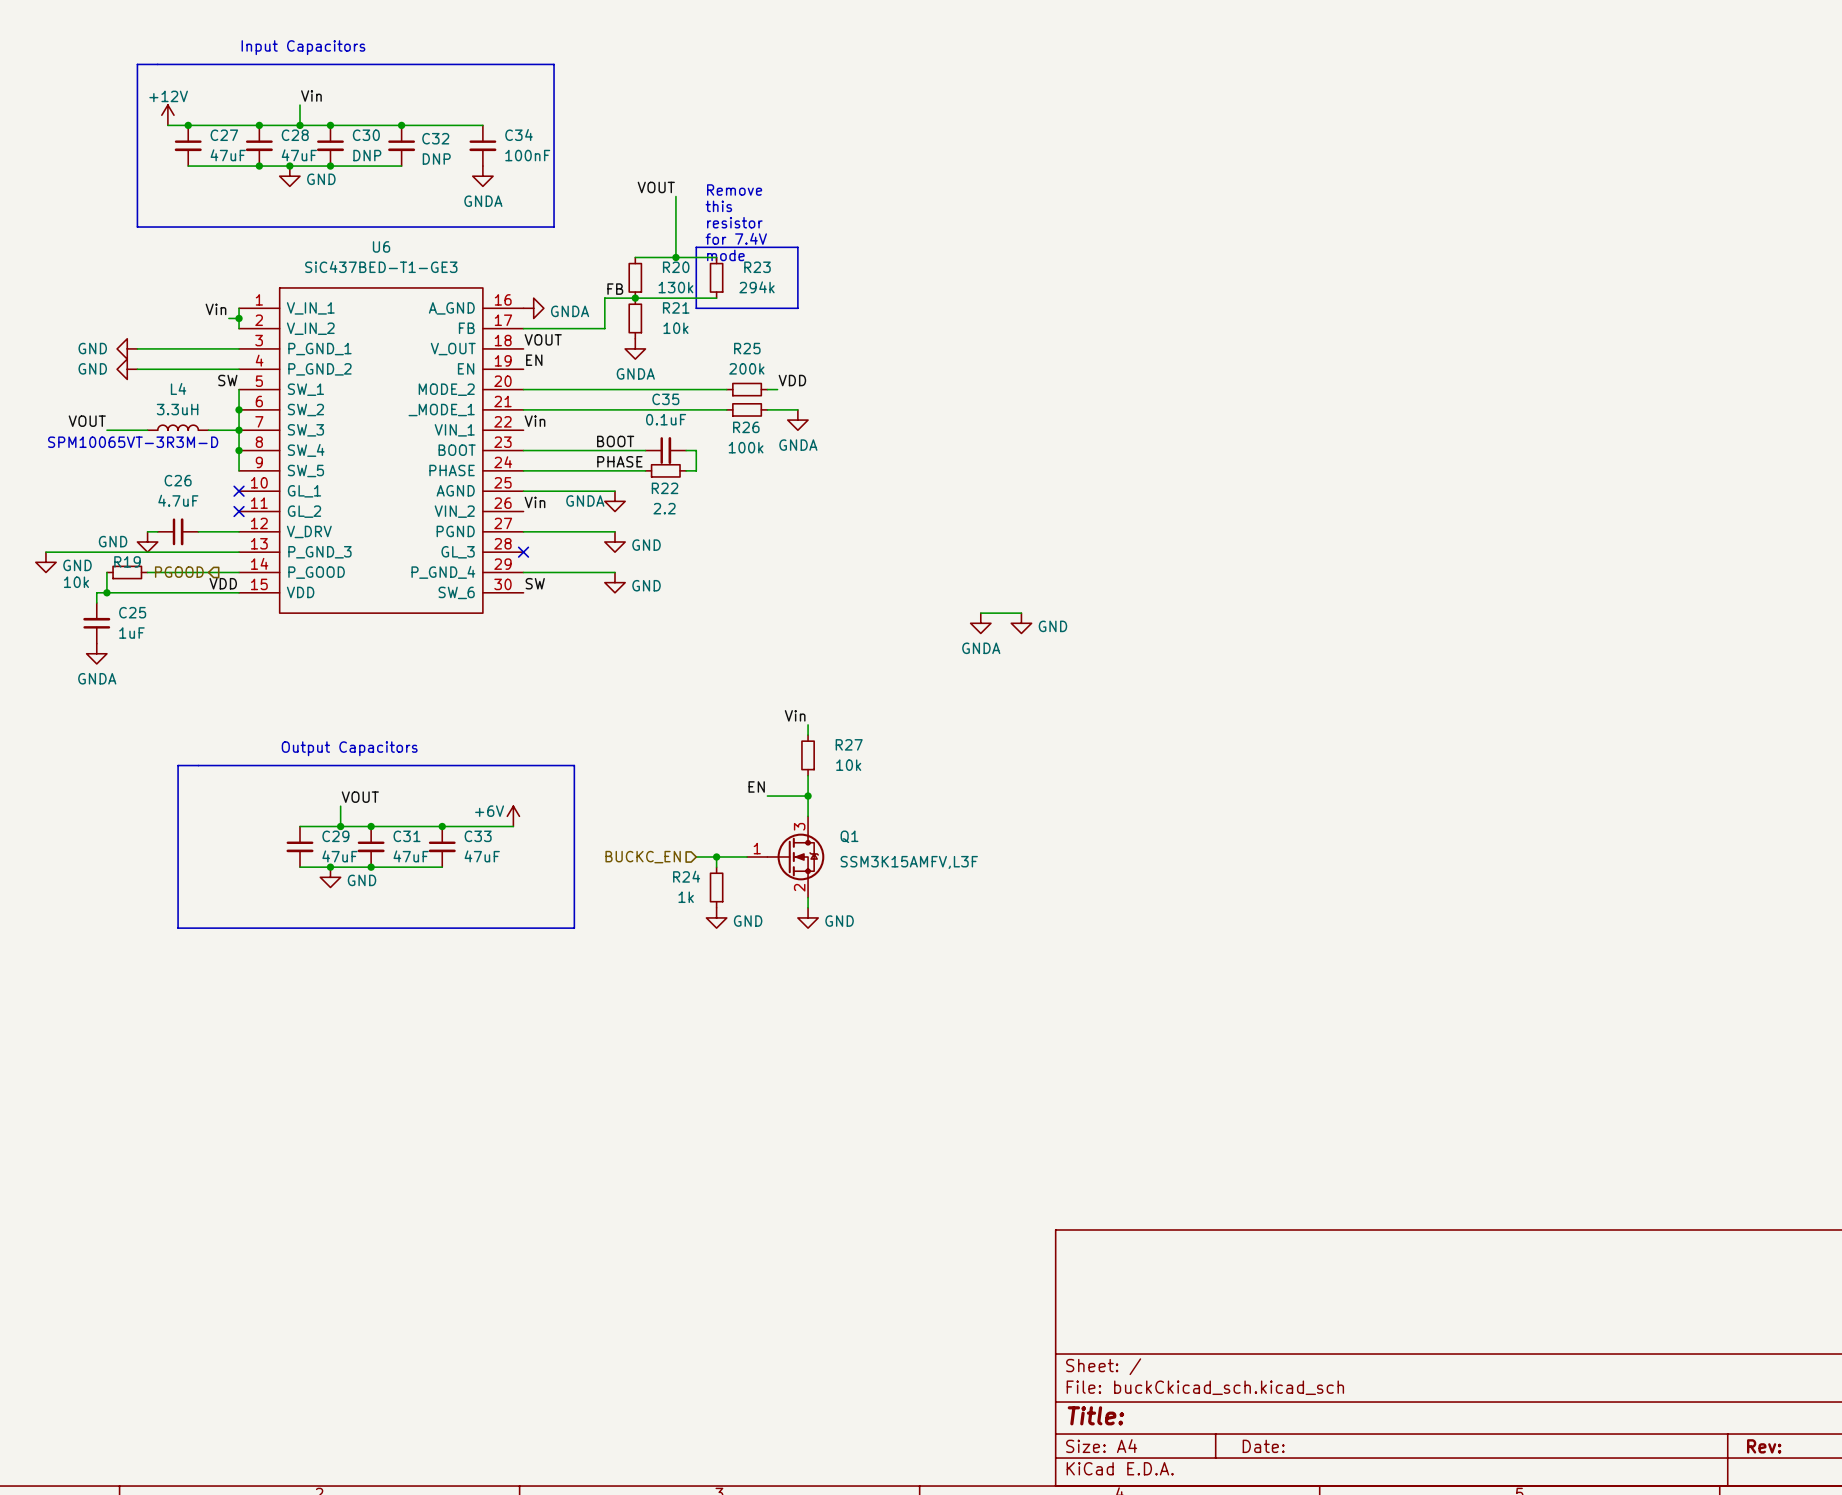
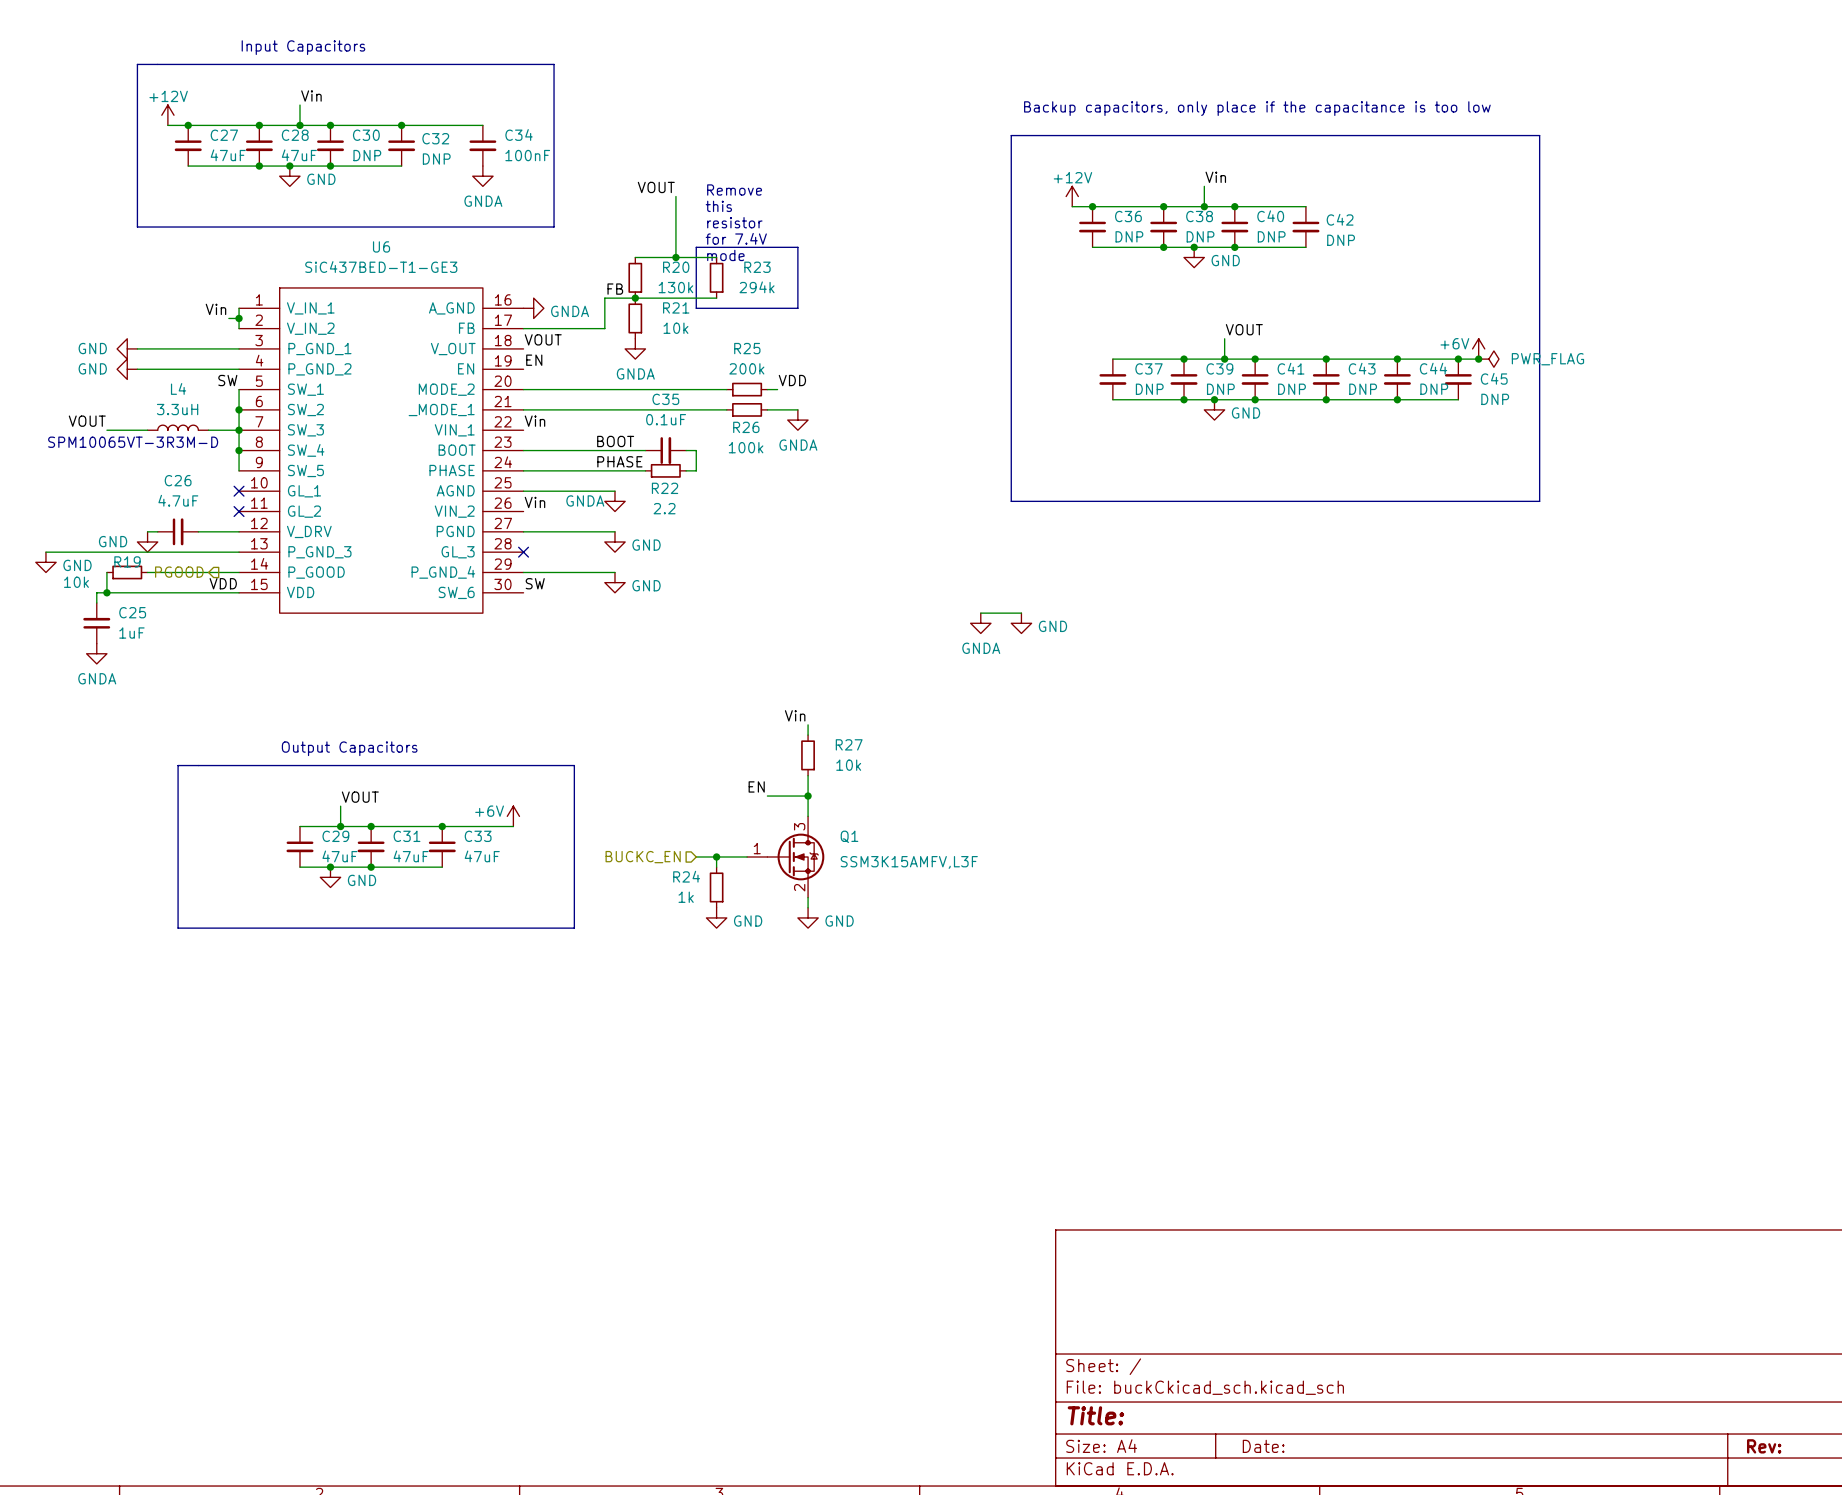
text: none -> Backup capacitors, only place if the capacitance is too low (1257, 108)
line: none -> (1011, 135) (1539, 135) (1539, 501) (1011, 501) (1011, 135)
label: none -> Vin (1215, 177)
wire: none -> (1204, 186) (1204, 206)
power symbol: none -> +12V (1072, 196)
wire: none -> (1072, 206) (1305, 206)
junction: none -> (1092, 206)
junction: none -> (1163, 206)
junction: none -> (1204, 206)
junction: none -> (1234, 206)
C36: none -> DNP (1092, 227)
C38: none -> DNP (1163, 227)
C40: none -> DNP (1234, 227)
C42: none -> DNP (1305, 227)
wire: none -> (1092, 247) (1305, 247)
junction: none -> (1163, 247)
junction: none -> (1194, 247)
junction: none -> (1234, 247)
power symbol: none -> GND (1194, 257)
label: none -> VOUT (1244, 329)
wire: none -> (1224, 338) (1224, 359)
power symbol: none -> +6V (1478, 348)
wire: none -> (1112, 359) (1478, 359)
junction: none -> (1184, 359)
junction: none -> (1224, 359)
junction: none -> (1255, 359)
junction: none -> (1326, 359)
junction: none -> (1397, 359)
junction: none -> (1458, 359)
junction: none -> (1478, 359)
power symbol: none -> PWR_FLAG (1488, 359)
C37: none -> DNP (1112, 379)
C39: none -> DNP (1184, 379)
C41: none -> DNP (1255, 379)
C43: none -> DNP (1326, 379)
C44: none -> DNP (1397, 379)
C45: none -> DNP (1458, 379)
wire: none -> (1112, 399) (1458, 399)
junction: none -> (1184, 399)
junction: none -> (1214, 399)
junction: none -> (1255, 399)
junction: none -> (1326, 399)
junction: none -> (1397, 399)
power symbol: none -> GND (1214, 409)

